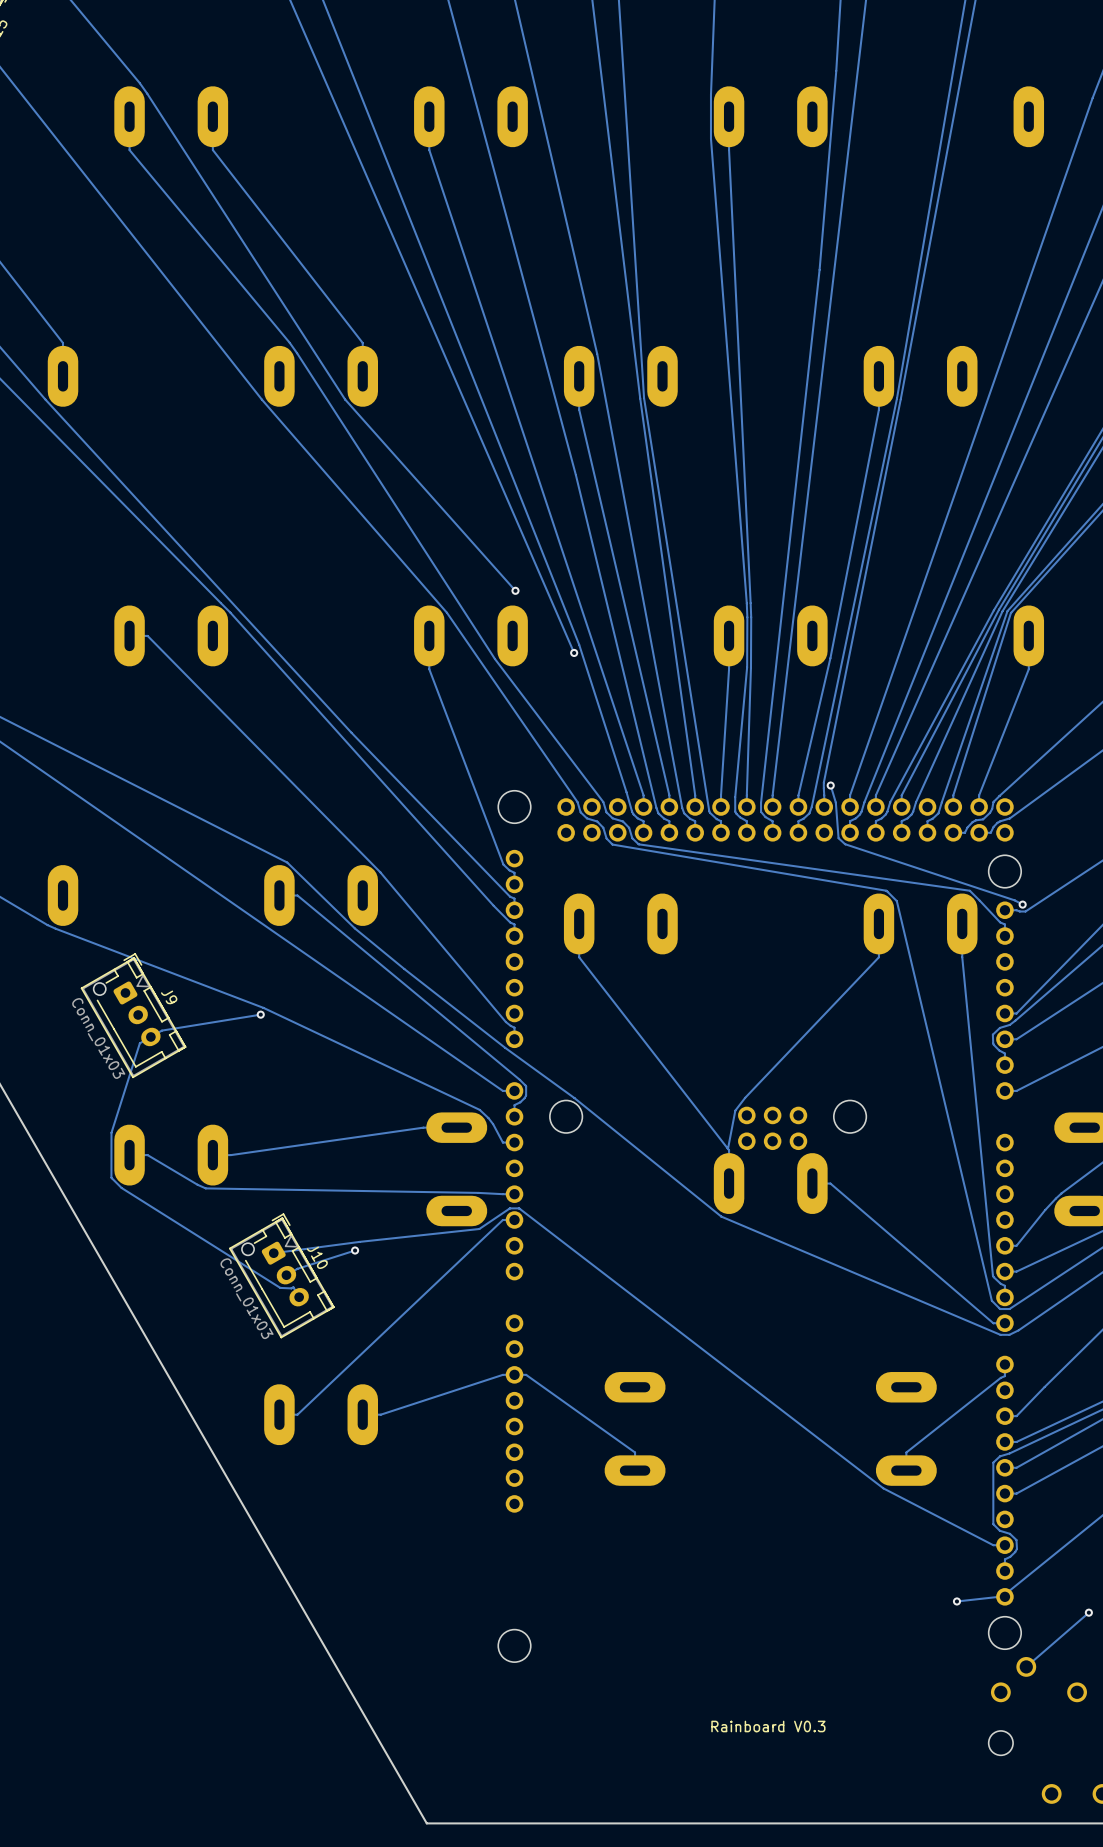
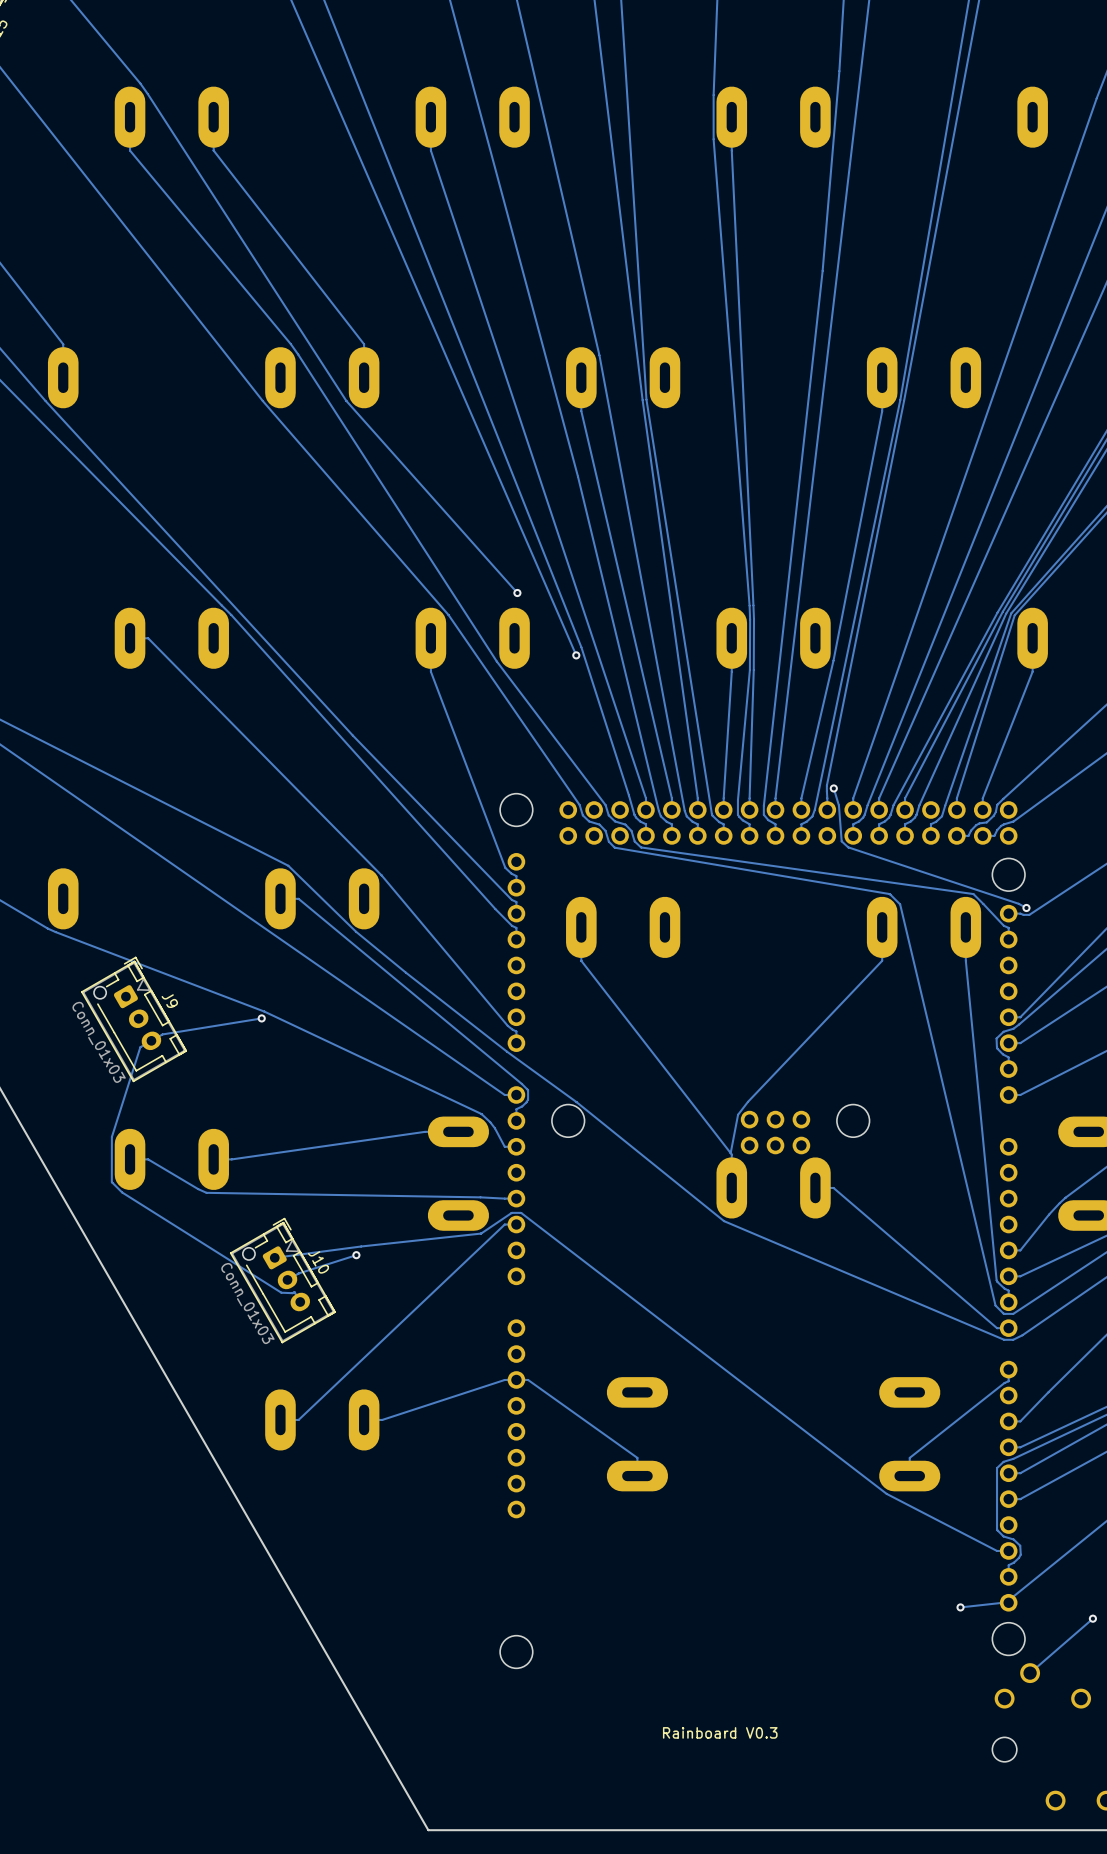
text position: Rainboard V0.3 (768, 1726) -> Rainboard V0.3 (720, 1732)

